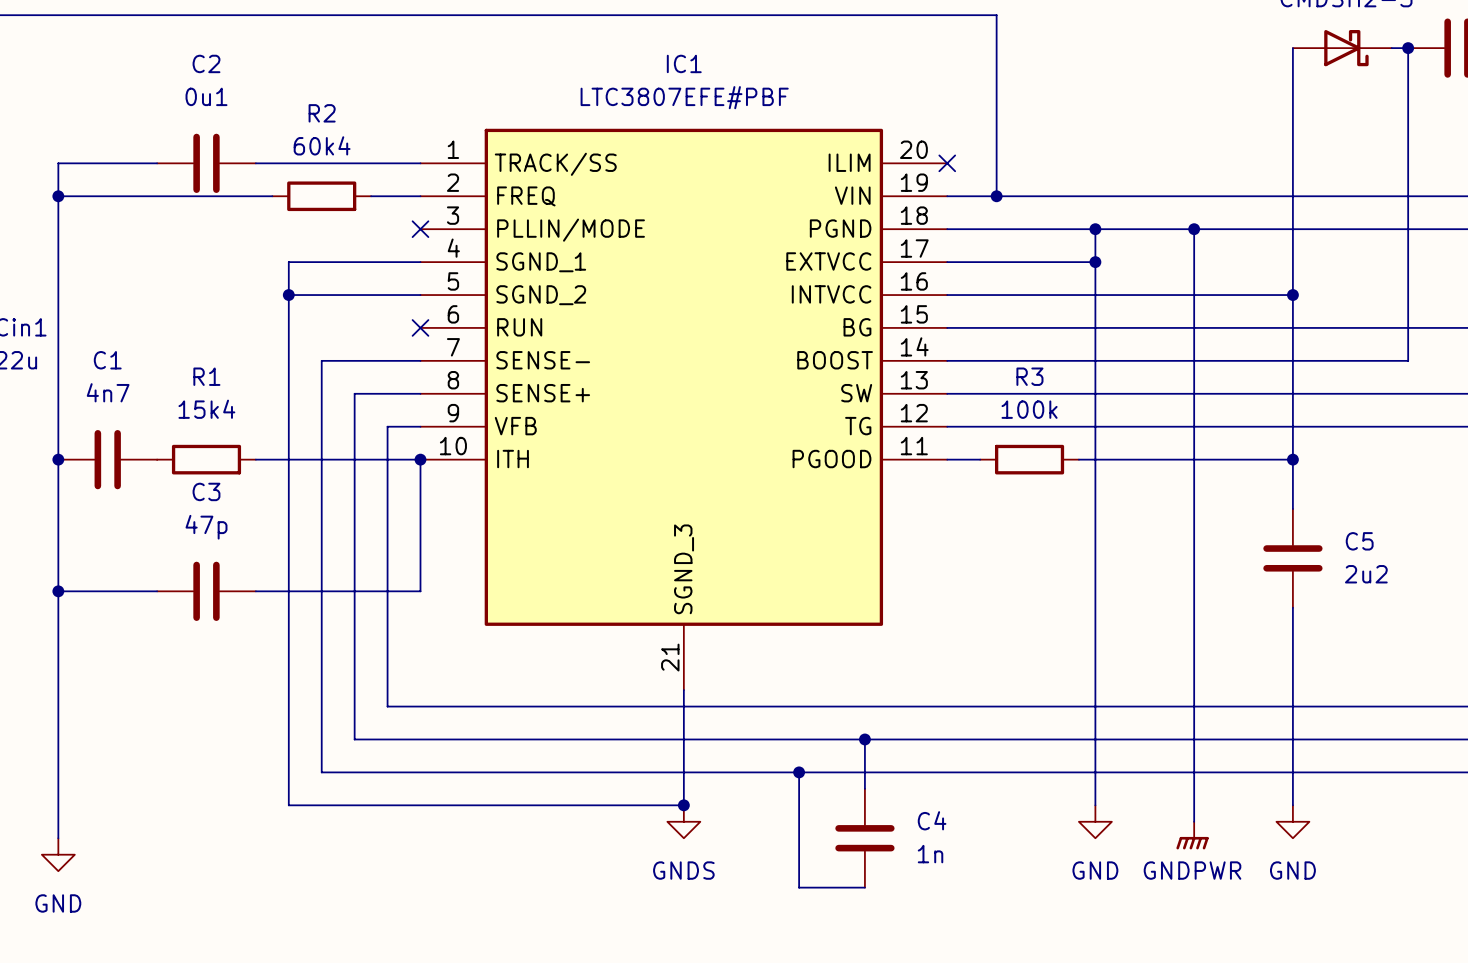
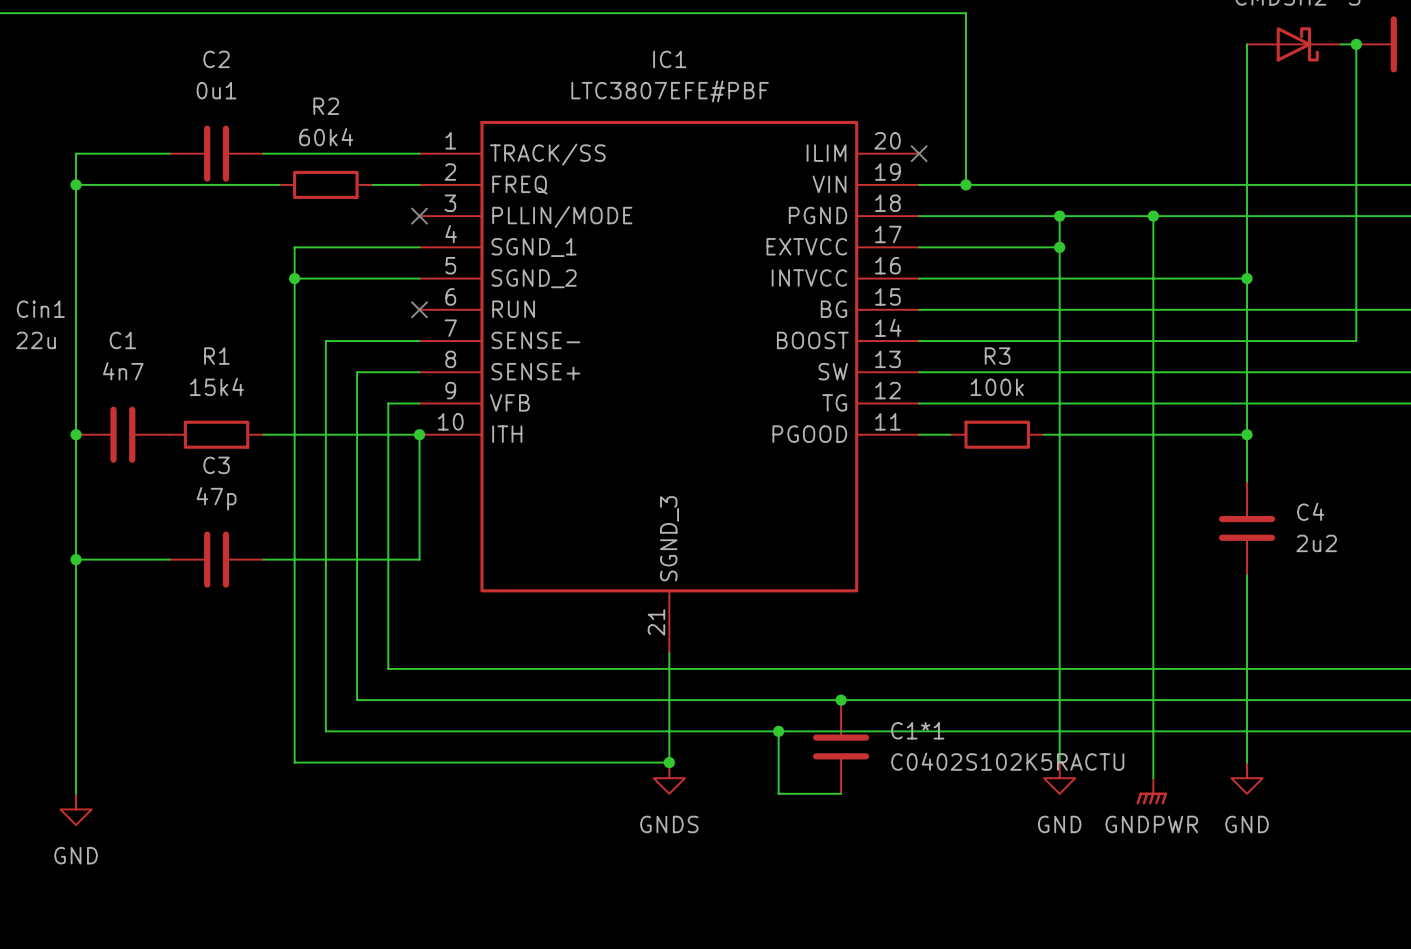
C5 name: C5 (1359, 541) -> C4 (1310, 511)
C1*1: none -> C0402S102K5RACTU (841, 746)
wire: (799, 838) (799, 887) (864, 887) -> (778, 793) (841, 793)
C4: 1n (864, 838) -> none

